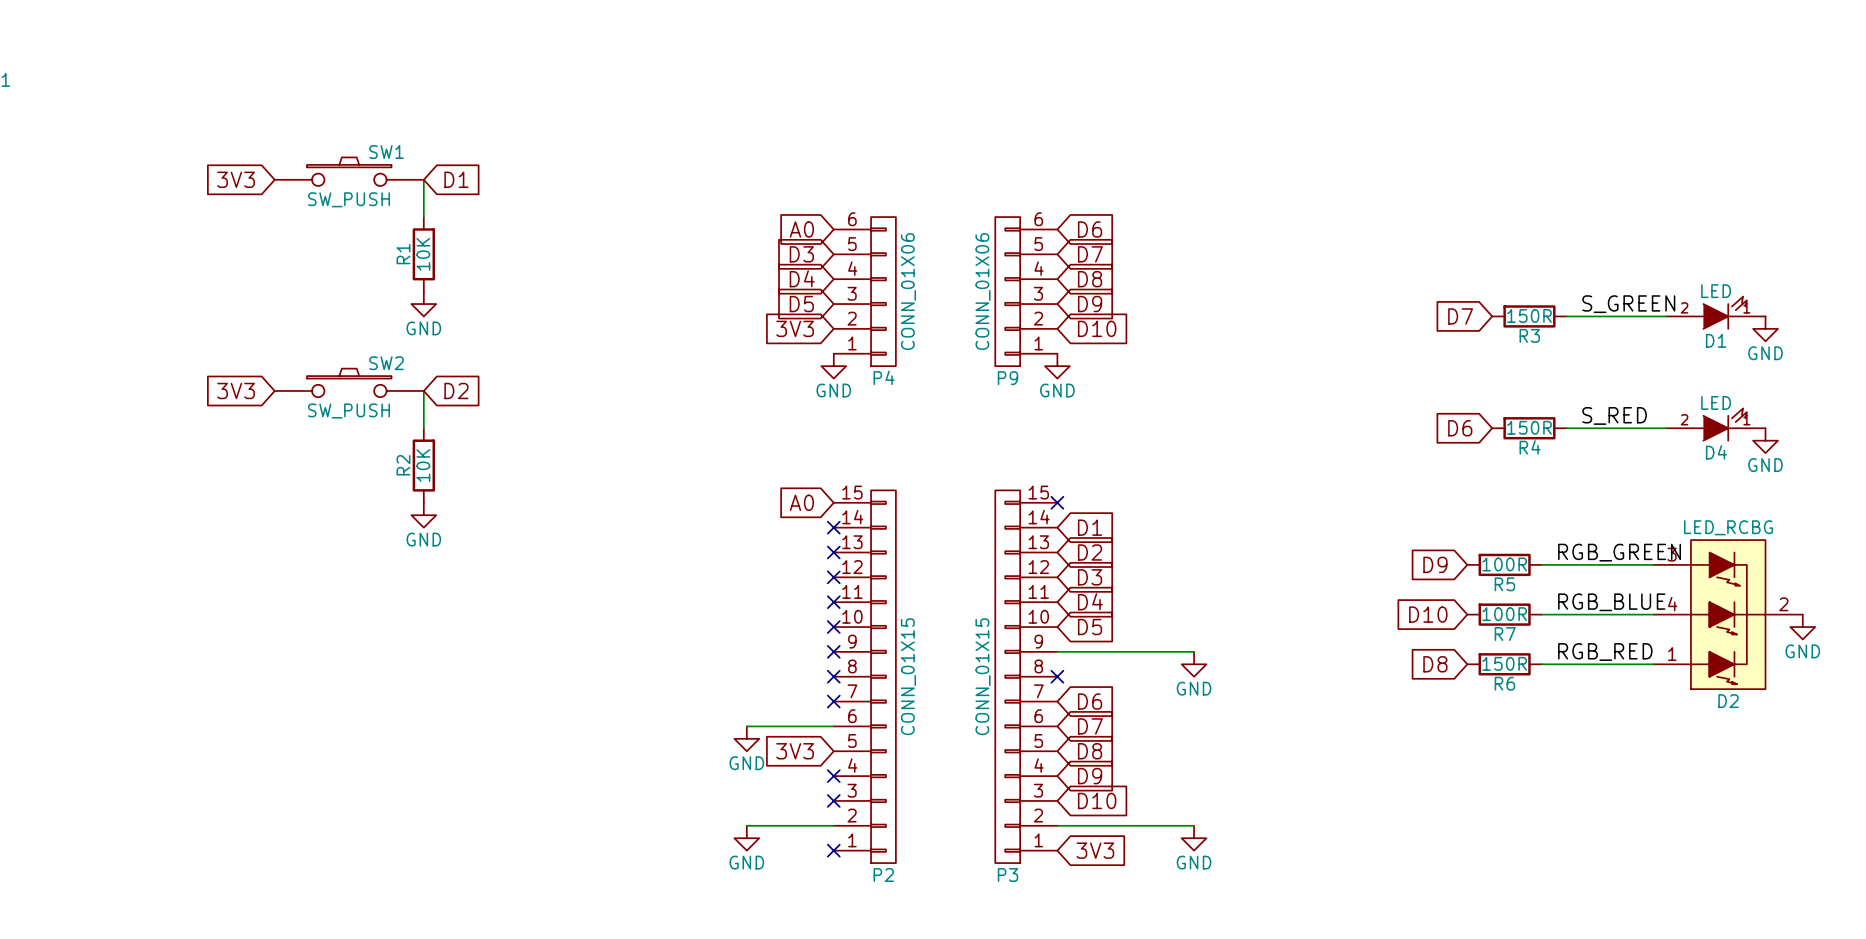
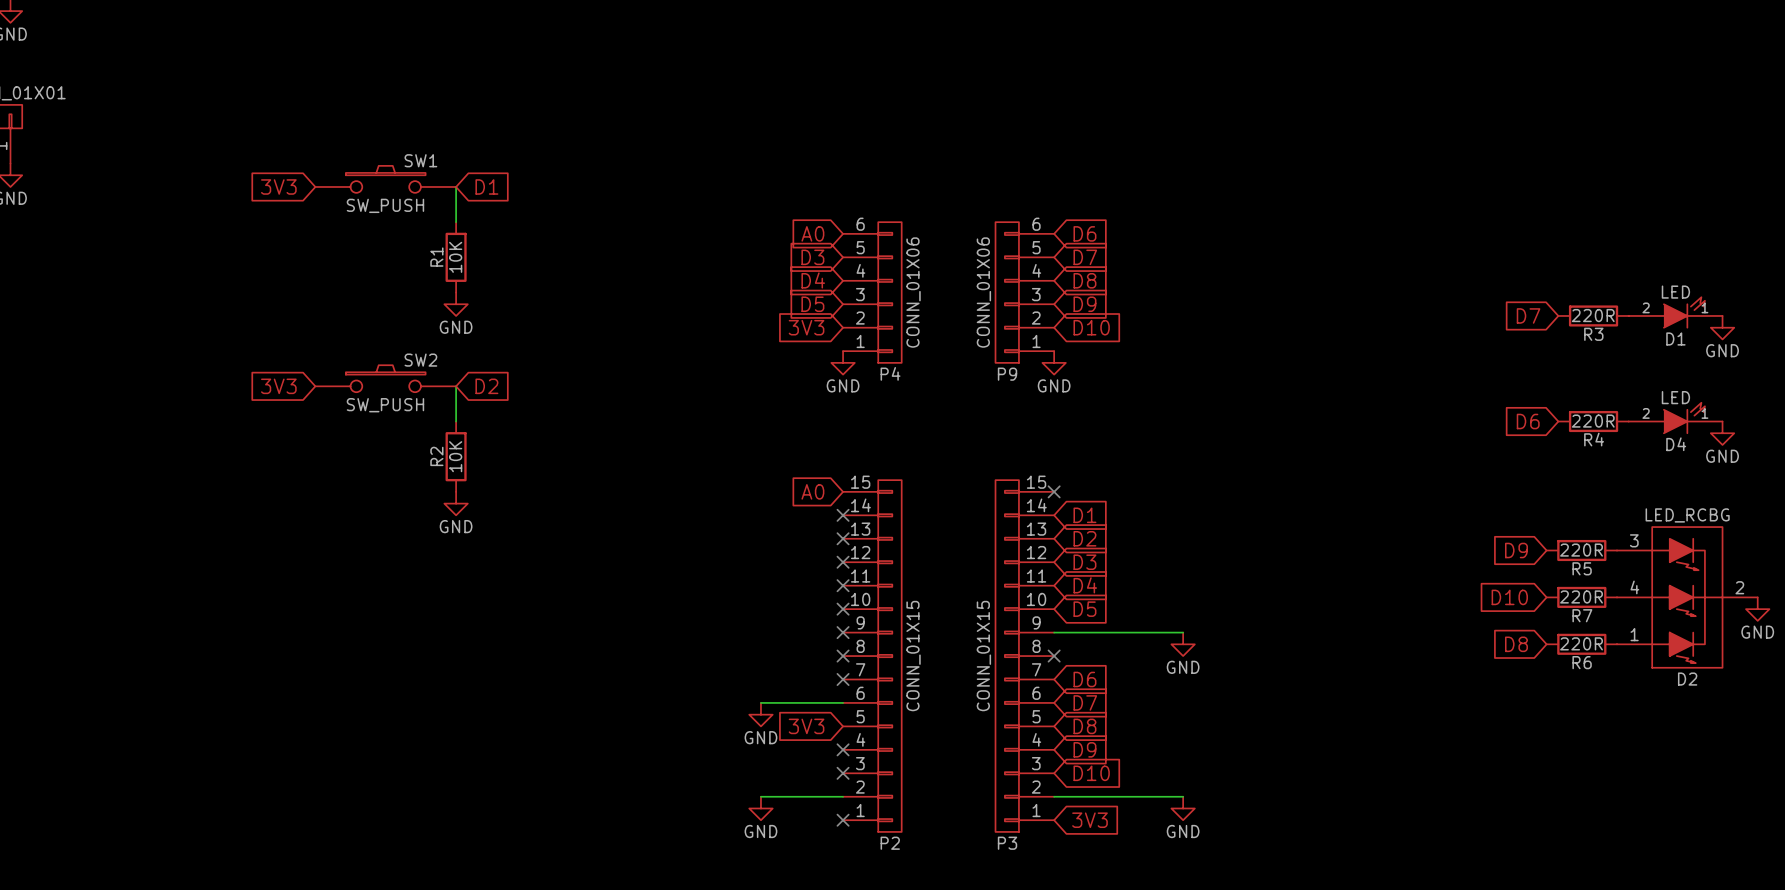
label: S_GREEN (1628, 304) -> none
R3 value: 150R (1529, 315) -> 220R (1593, 315)
global label position: D7 (1460, 316) -> D7 (1528, 315)
R3 position: (1529, 316) -> (1593, 315)
wire: (1566, 316) (1666, 316) -> none
label: S_RED (1614, 415) -> none
R4 value: 150R (1529, 427) -> 220R (1593, 421)
global label position: D6 (1460, 428) -> D6 (1528, 421)
R4 position: (1529, 428) -> (1593, 421)
wire: (1566, 428) (1666, 428) -> none
label: RGB_GREEN (1619, 552) -> none
global label position: D9 (1435, 564) -> D9 (1516, 550)
R5 position: (1504, 564) -> (1581, 550)
R5 value: 100R (1504, 564) -> 220R (1581, 550)
wire: (1541, 564) (1653, 564) -> none
label: RGB_BLUE (1611, 602) -> none
global label position: D10 (1428, 614) -> D10 (1509, 597)
R7 position: (1504, 614) -> (1581, 597)
R7 value: 100R (1504, 614) -> 220R (1581, 596)
wire: (1541, 614) (1653, 614) -> none
label: RGB_RED (1605, 652) -> none
R6 value: 150R (1504, 663) -> 220R (1581, 643)
global label position: D8 (1435, 664) -> D8 (1516, 644)
R6 position: (1504, 664) -> (1581, 644)
wire: (1541, 664) (1653, 664) -> none

